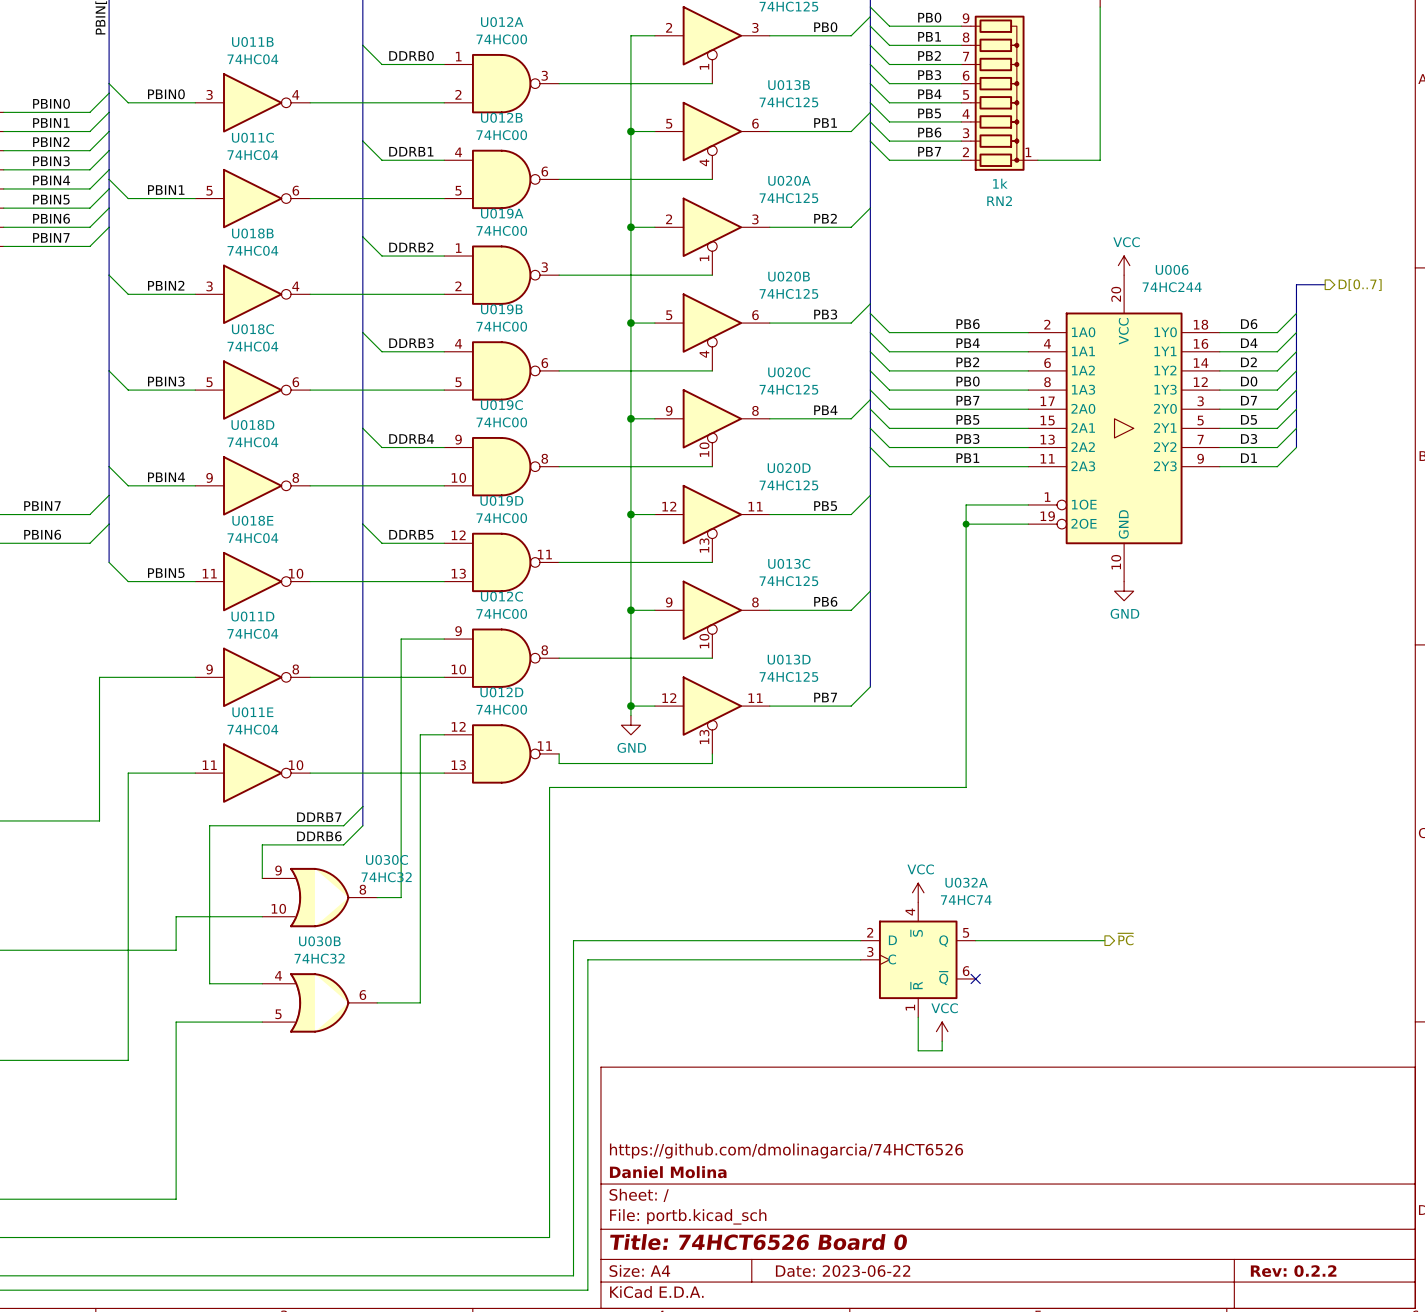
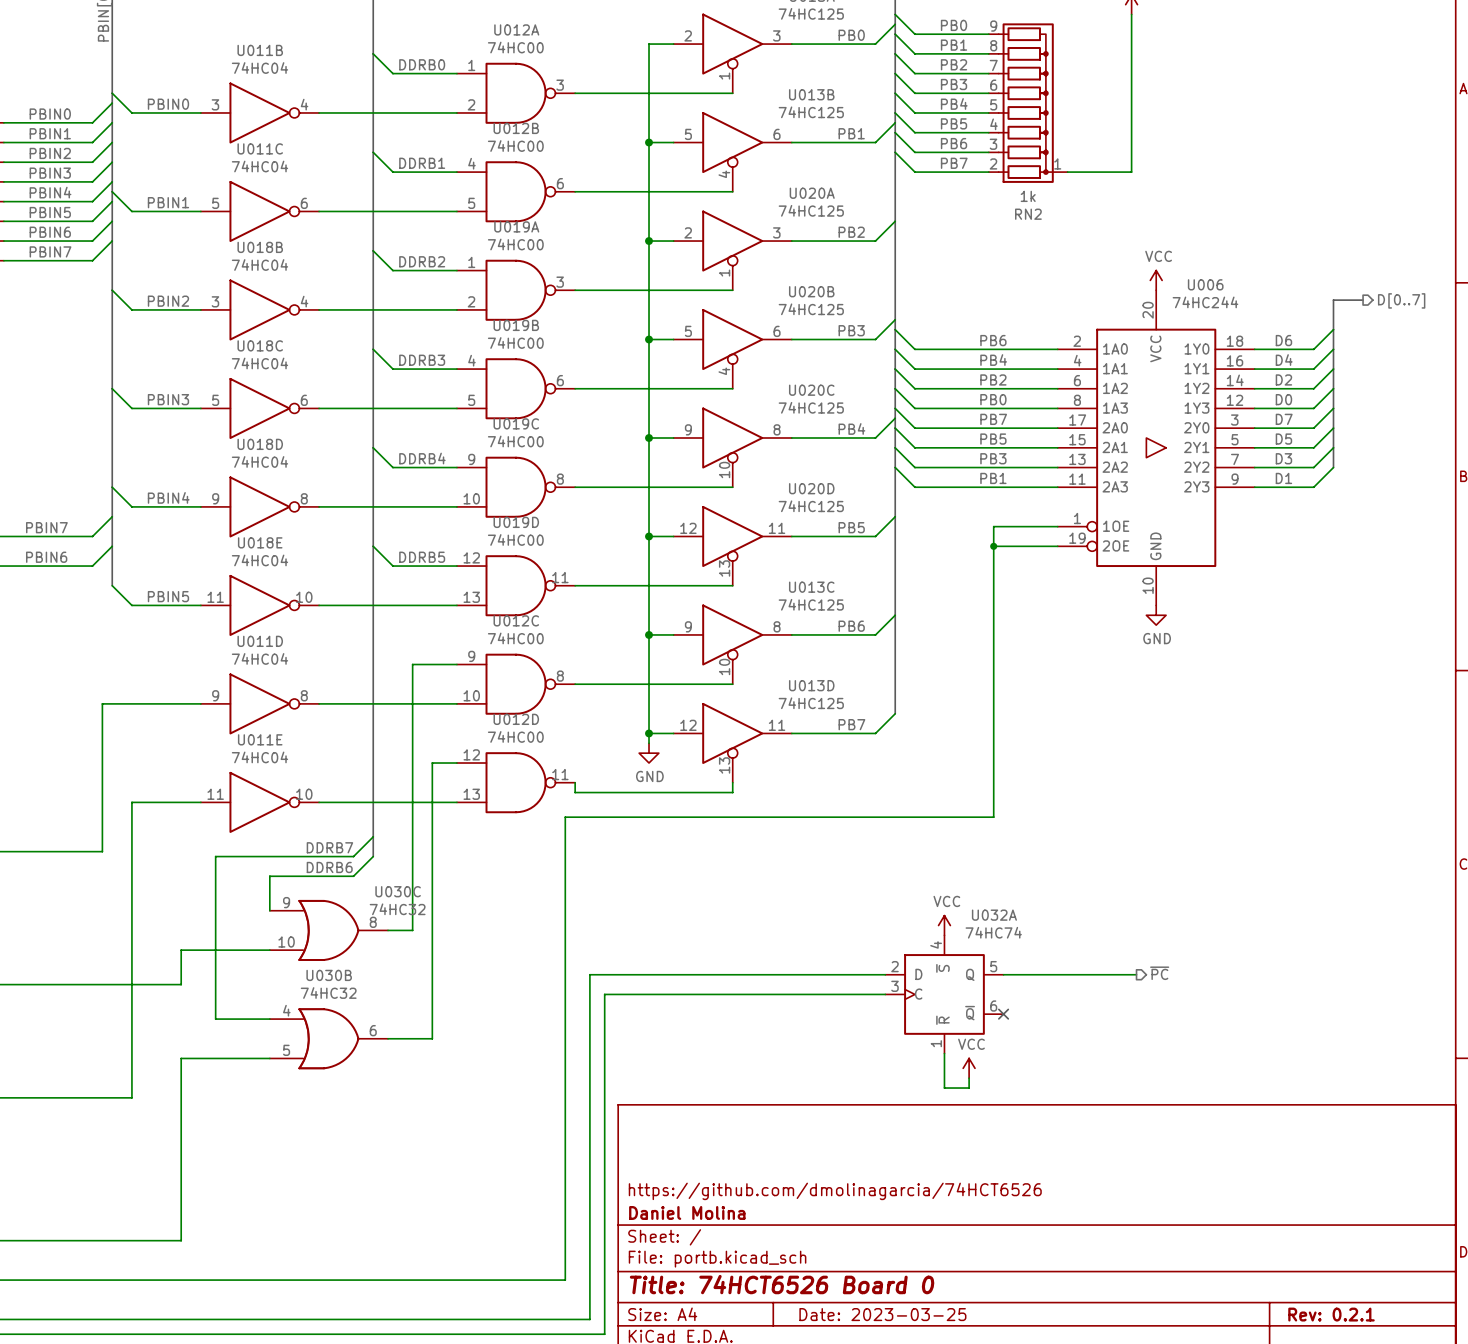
title block: Date: 2023-06-22 (843, 1271) -> Date: 2023-03-25 (882, 1314)
title block: Rev: 0.2.2 (1293, 1271) -> Rev: 0.2.1 (1331, 1314)

